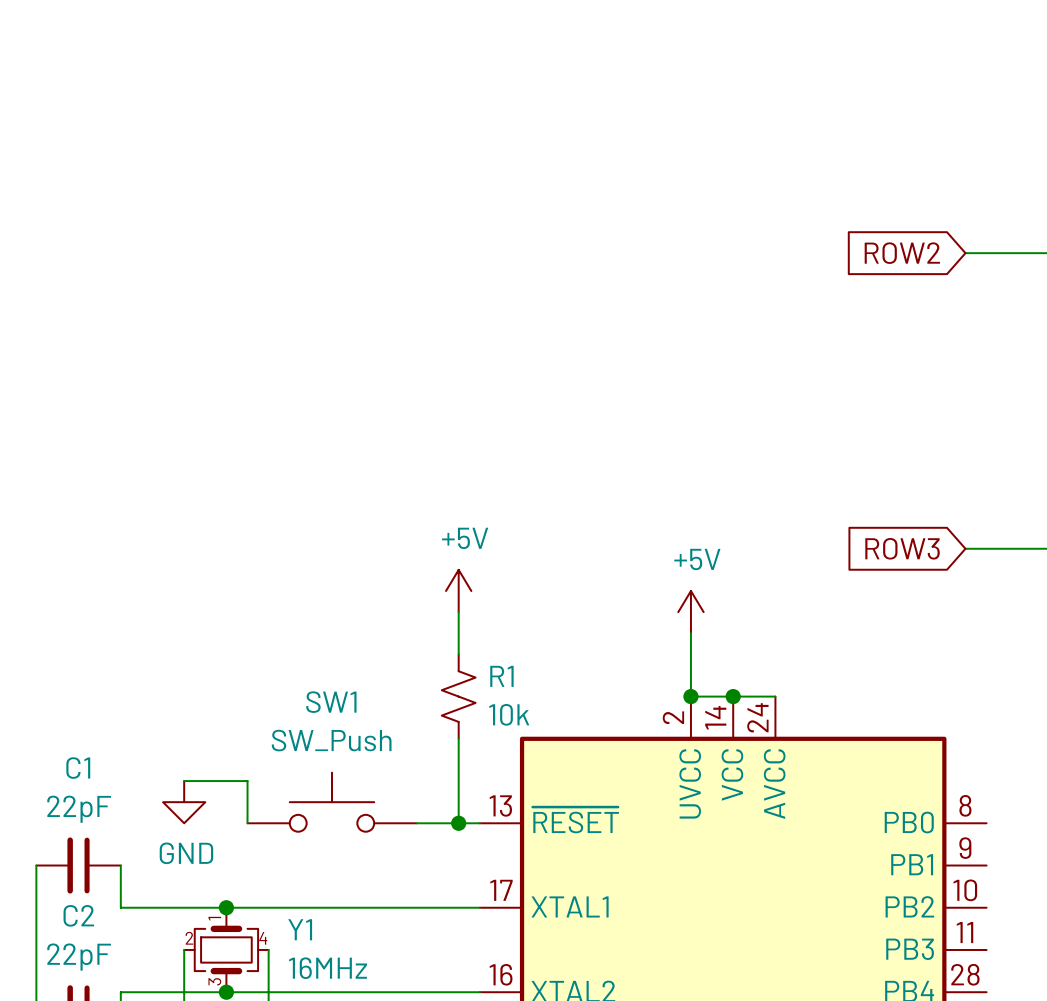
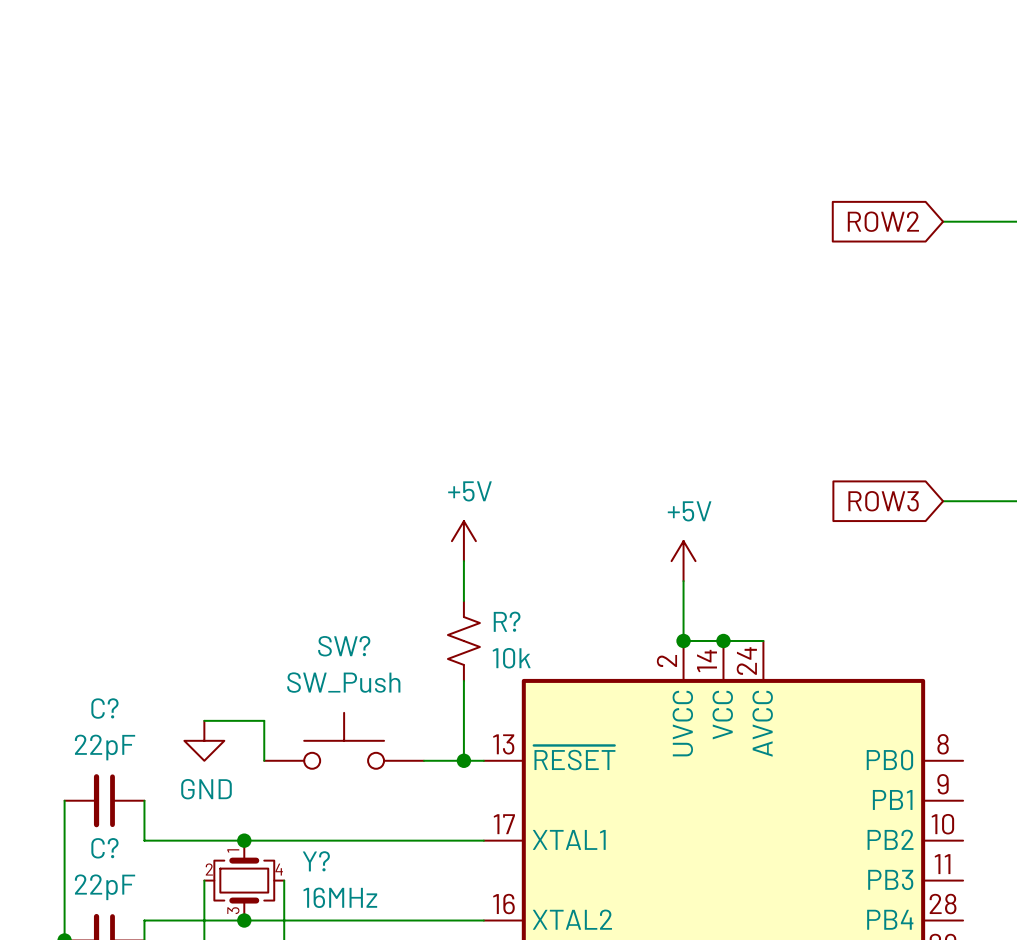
R1 name: R1 (501, 676) -> R? (507, 621)
SW1 name: SW1 (331, 702) -> SW? (344, 646)
C1 name: C1 (78, 768) -> C? (104, 708)
C2 name: C2 (78, 915) -> C? (104, 848)
Y1 name: Y1 (300, 929) -> Y? (316, 861)

